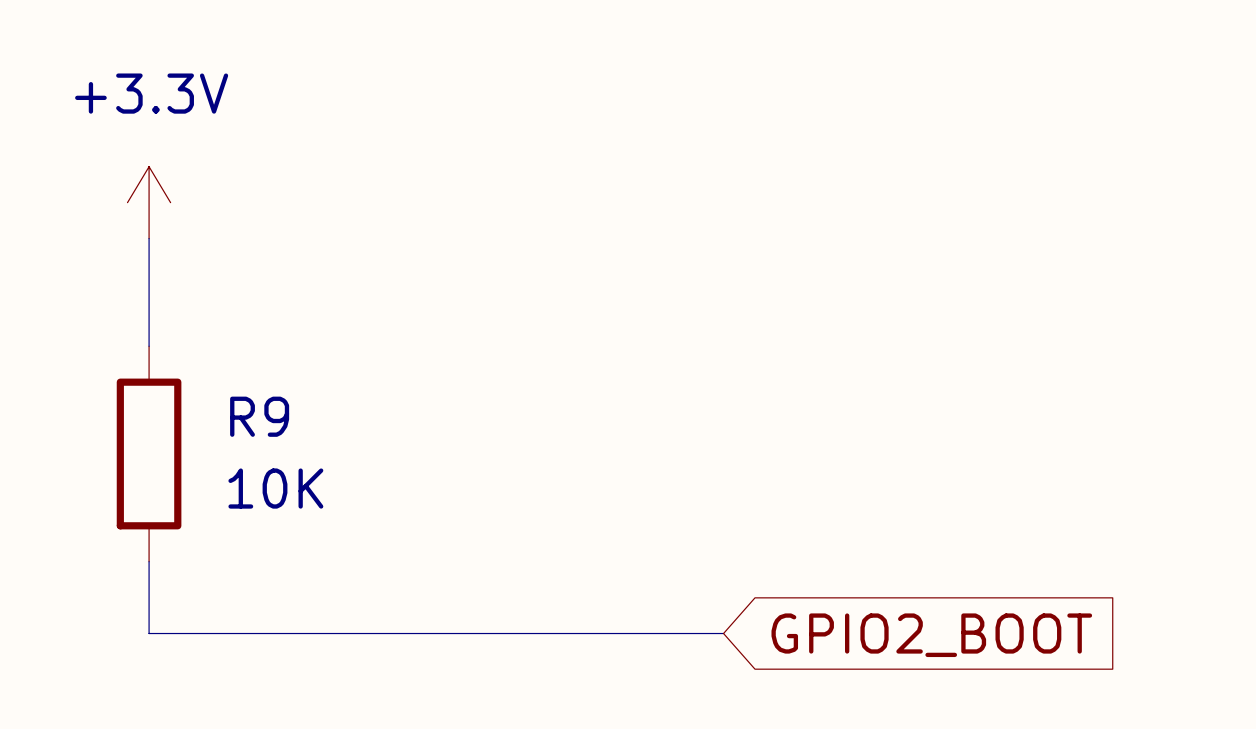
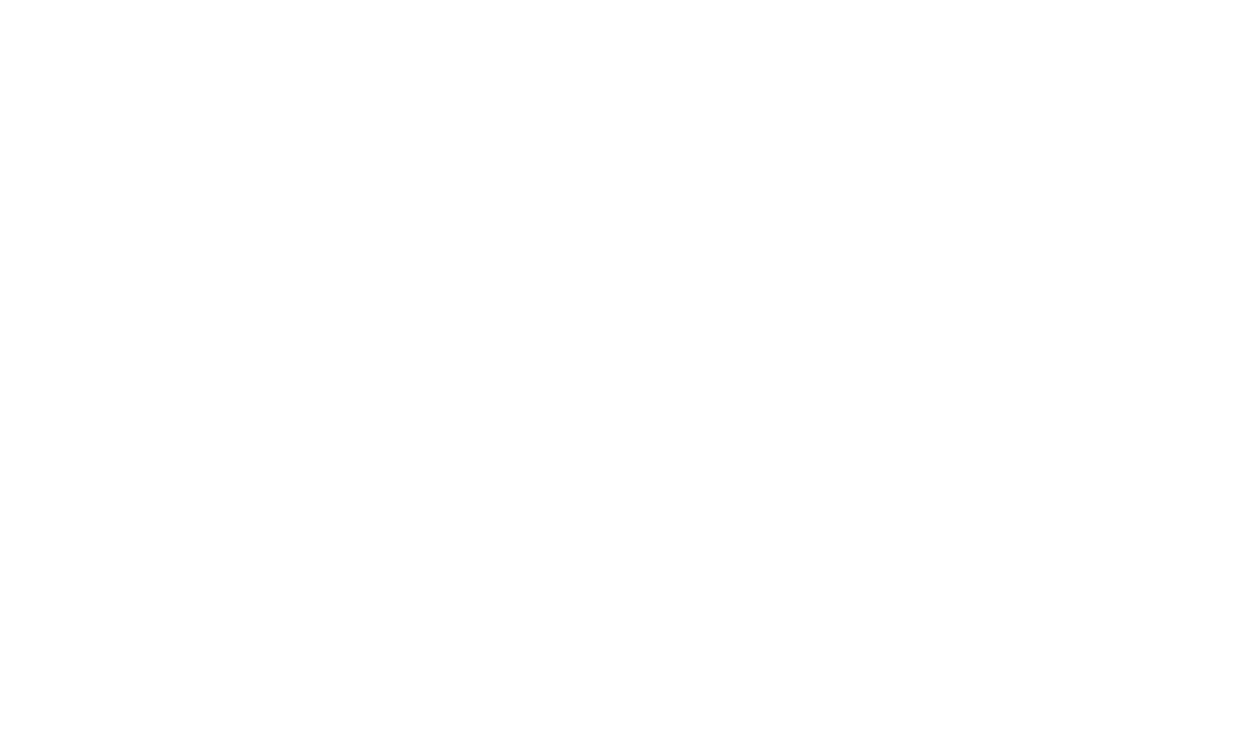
power symbol: +3.3V (149, 202) -> none
wire: (149, 238) (149, 346) -> none
R9: 10K (149, 453) -> none
wire: (149, 561) (149, 633) (723, 633) -> none
global label: GPIO2_BOOT (931, 635) -> none

